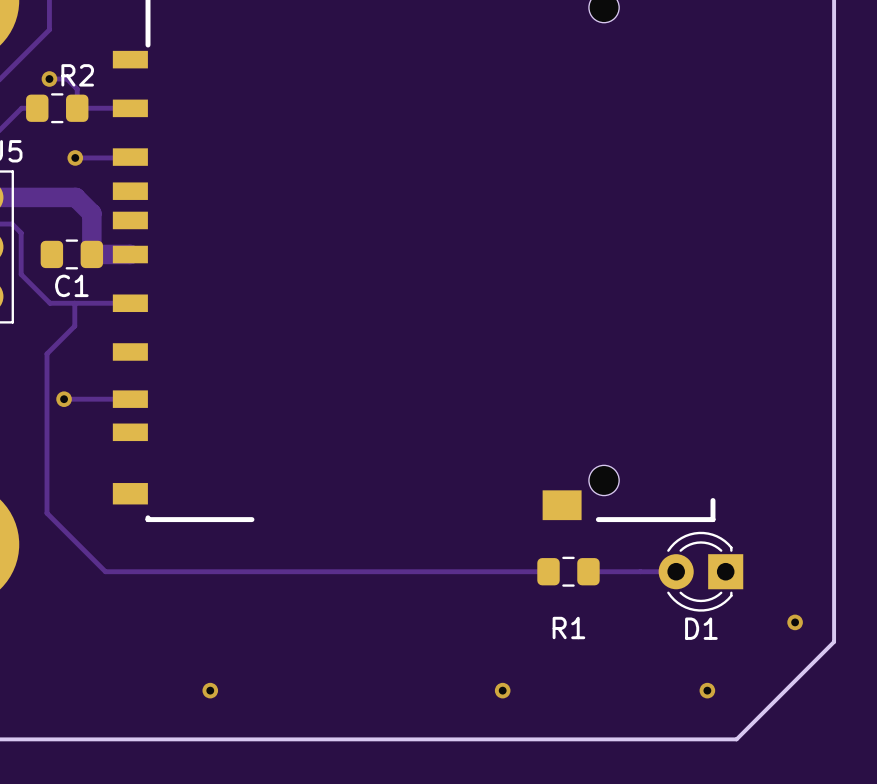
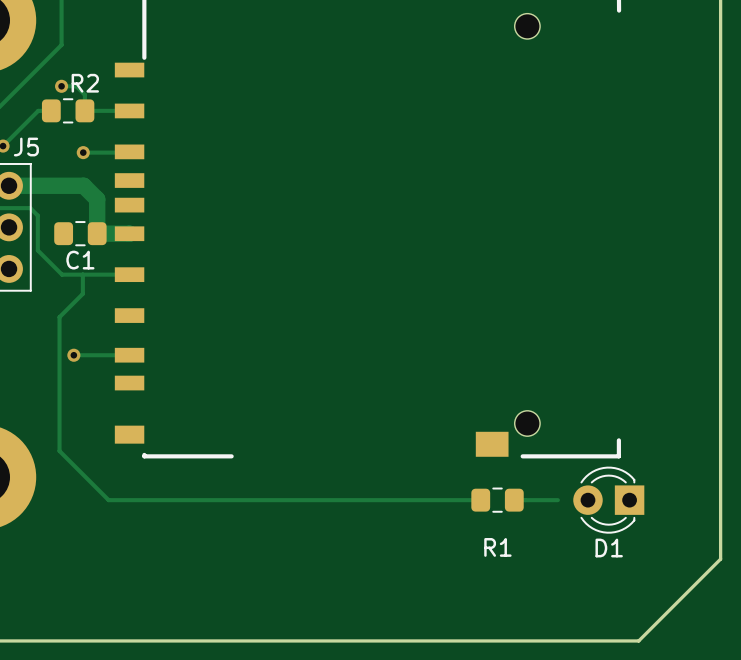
track: (640, 571) (676, 571) -> none
via: (795, 622) -> none
via: (210, 690) -> none
via: (502, 690) -> none
via: (707, 690) -> none

